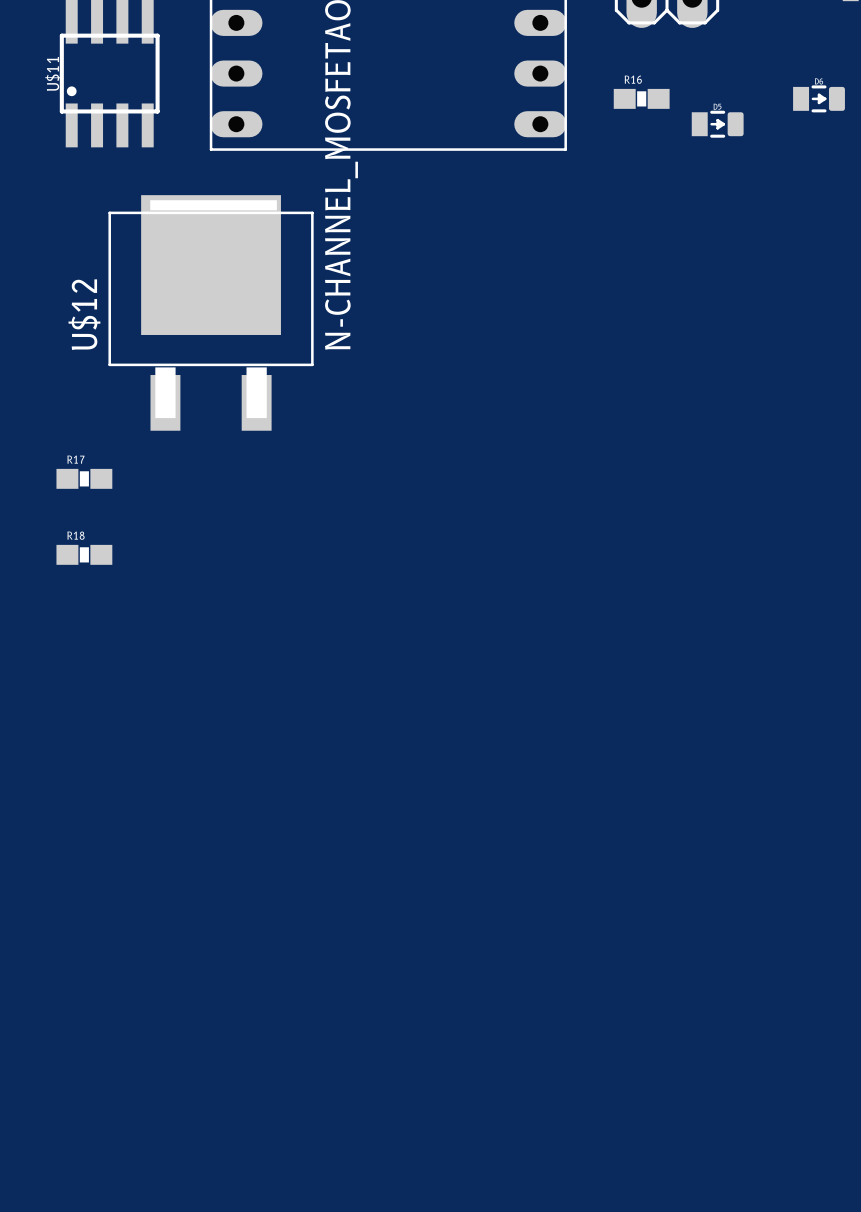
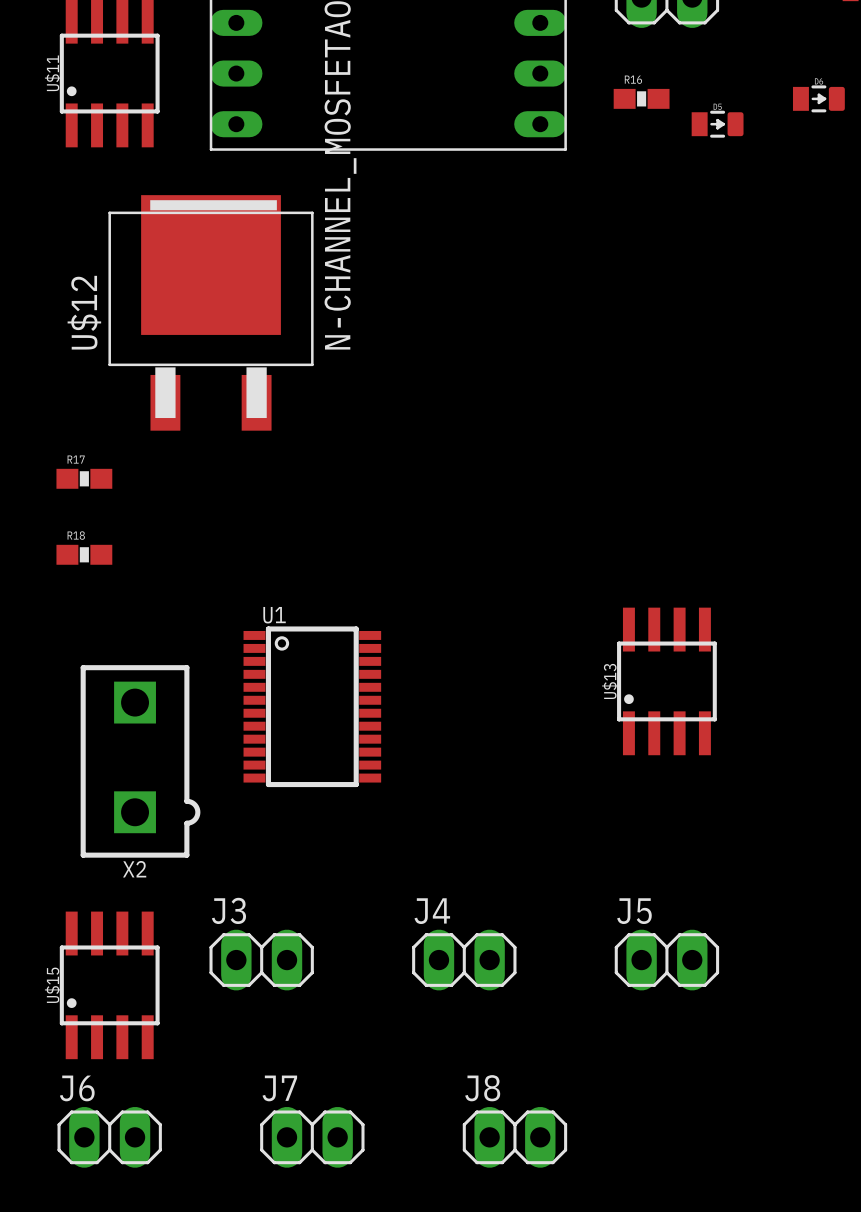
U$13: none -> (666, 681)
U1: none -> (312, 706)
X2: none -> (140, 761)
J3: none -> (261, 960)
J4: none -> (464, 960)
J5: none -> (666, 960)
U$15: none -> (109, 985)
J6: none -> (109, 1137)
J7: none -> (312, 1137)
J8: none -> (514, 1137)

